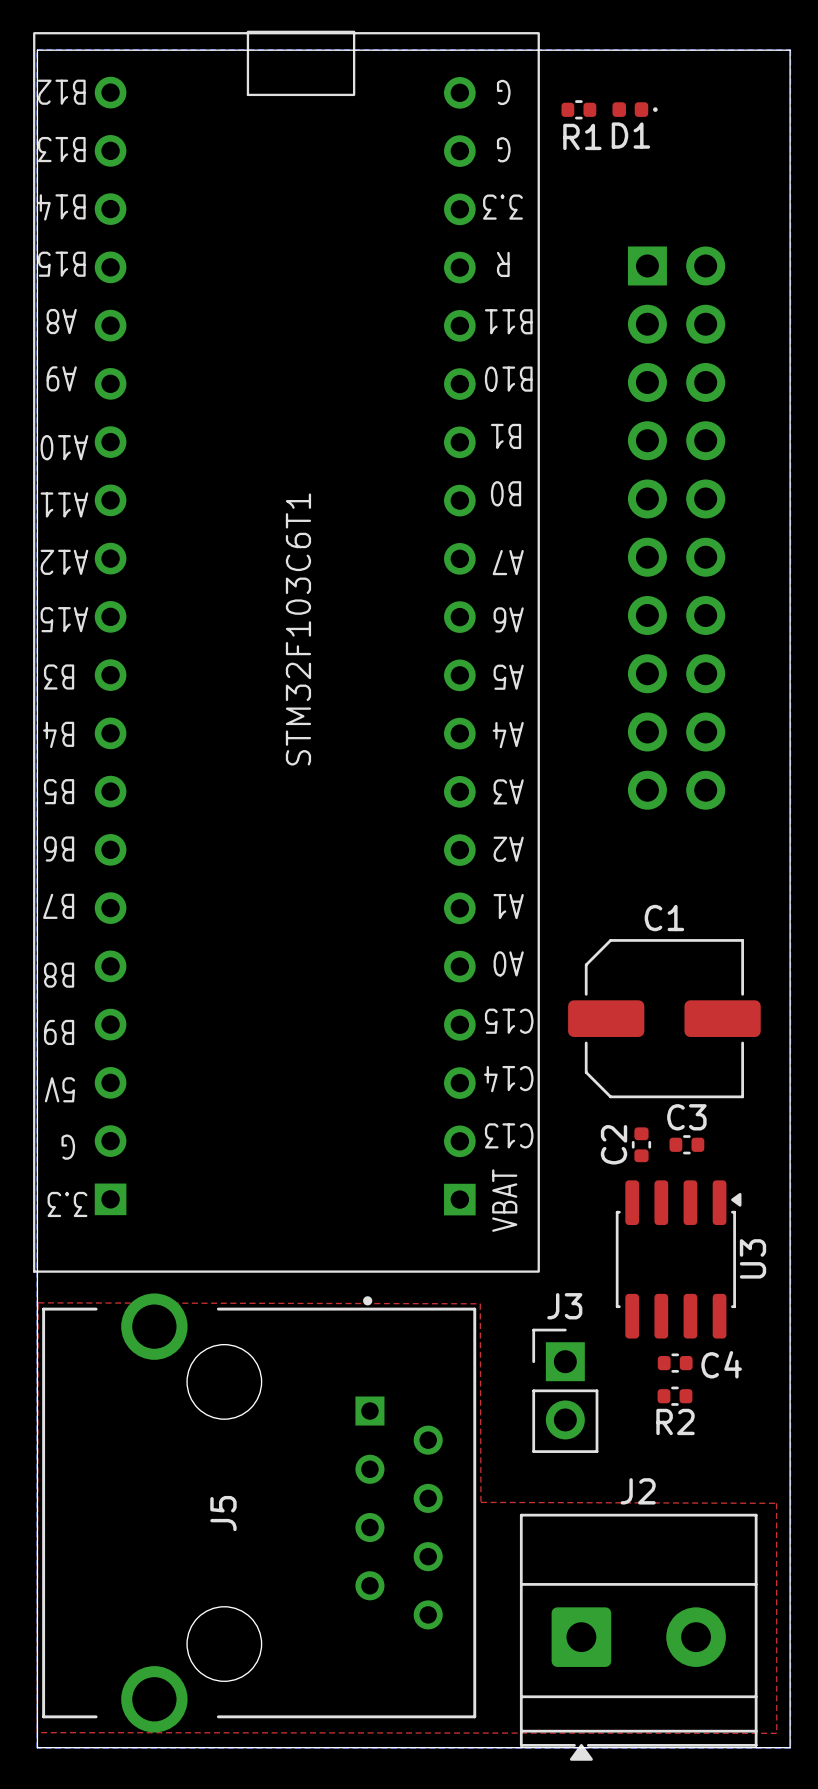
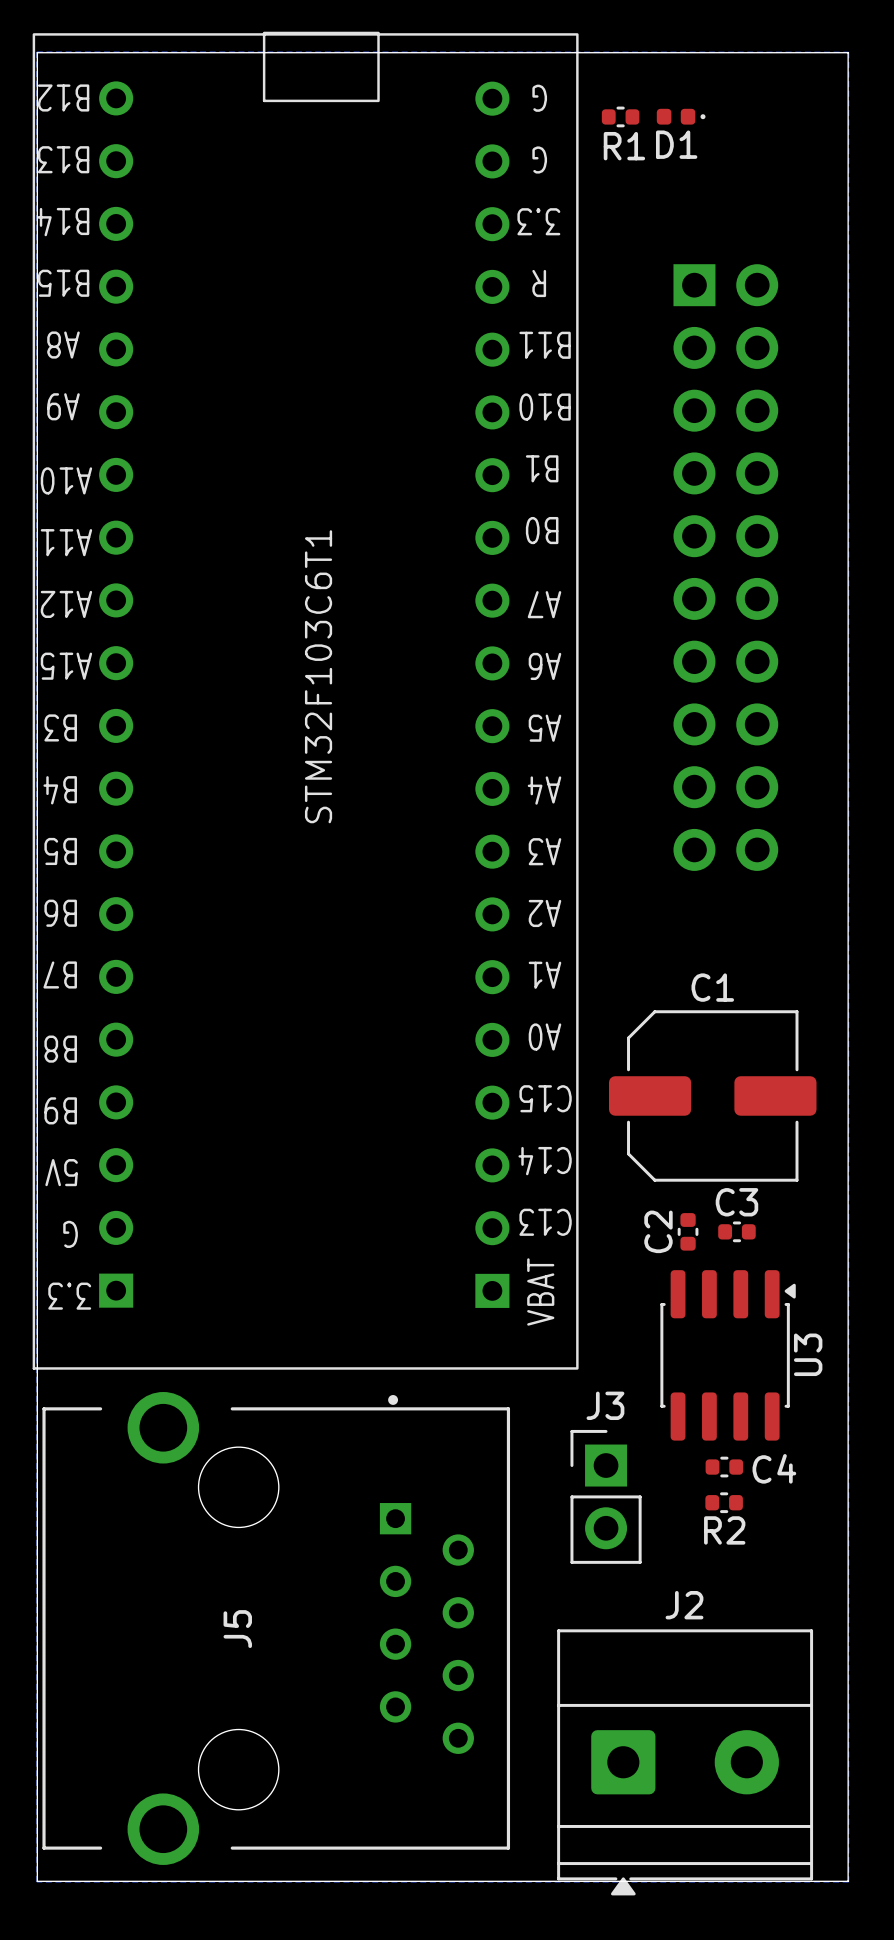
top zone outline: (38, 1302) (37, 1732) (776, 1733) (776, 1503) (480, 1502) (480, 1303) (38, 1302) -> none

